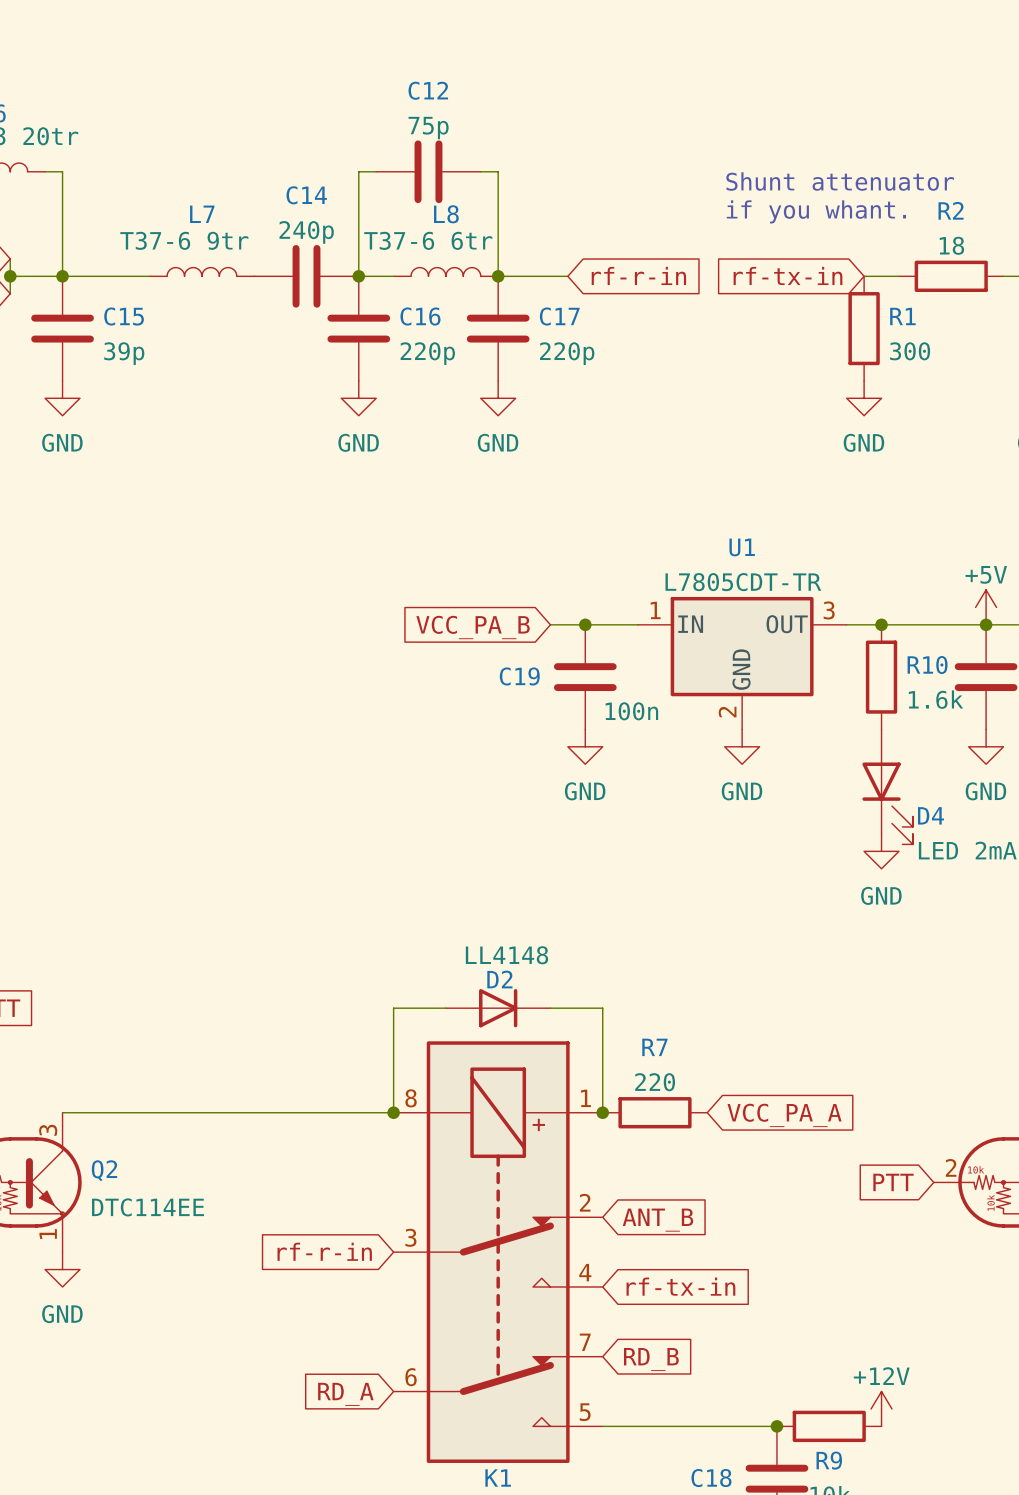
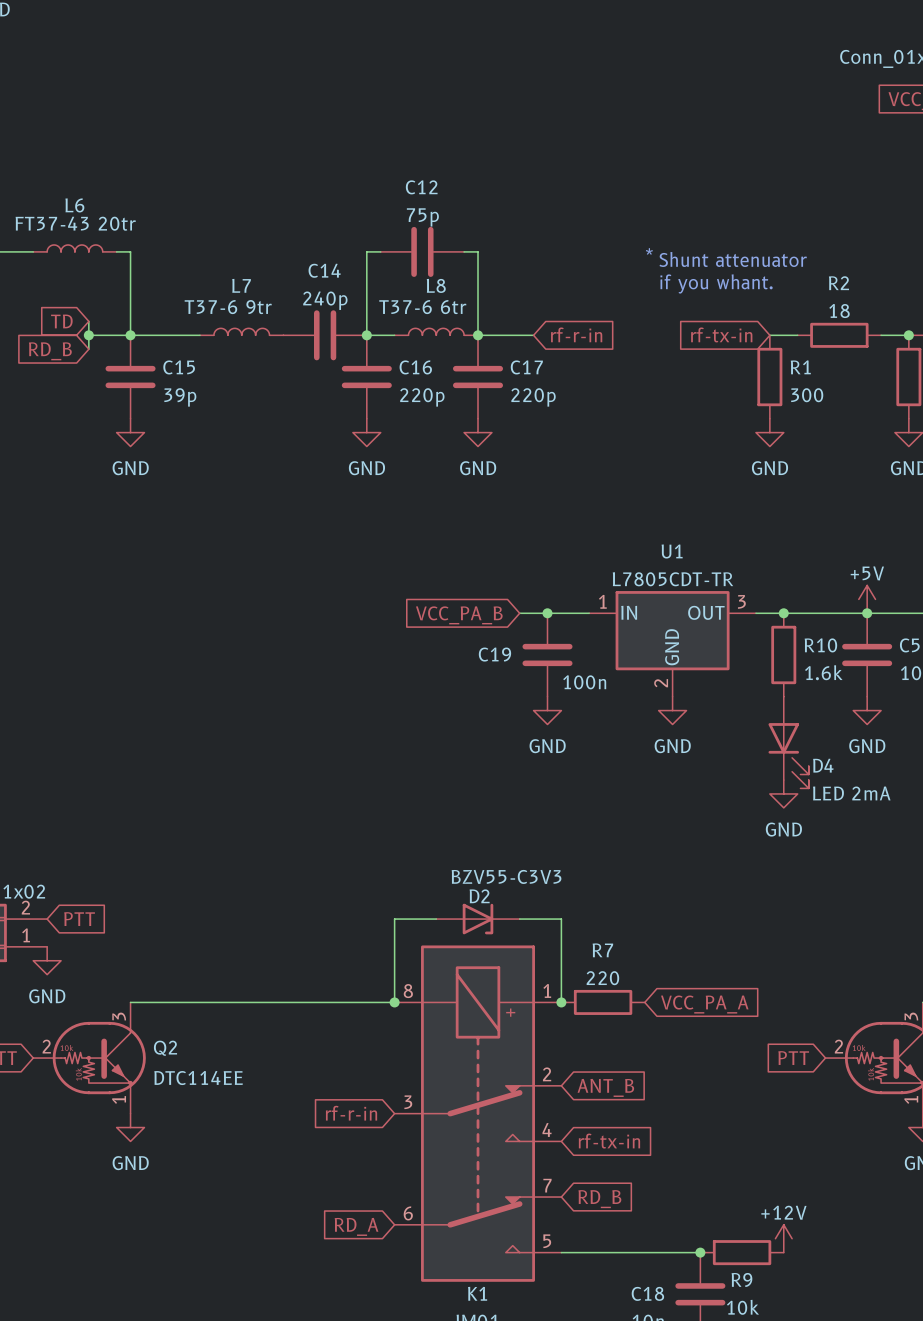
text: none -> * (649, 251)
D2 value: LL4148 (506, 955) -> BZV55-C3V3 (506, 876)
D2 symbol: [445, 989, 551, 1028] -> [436, 903, 520, 935]

